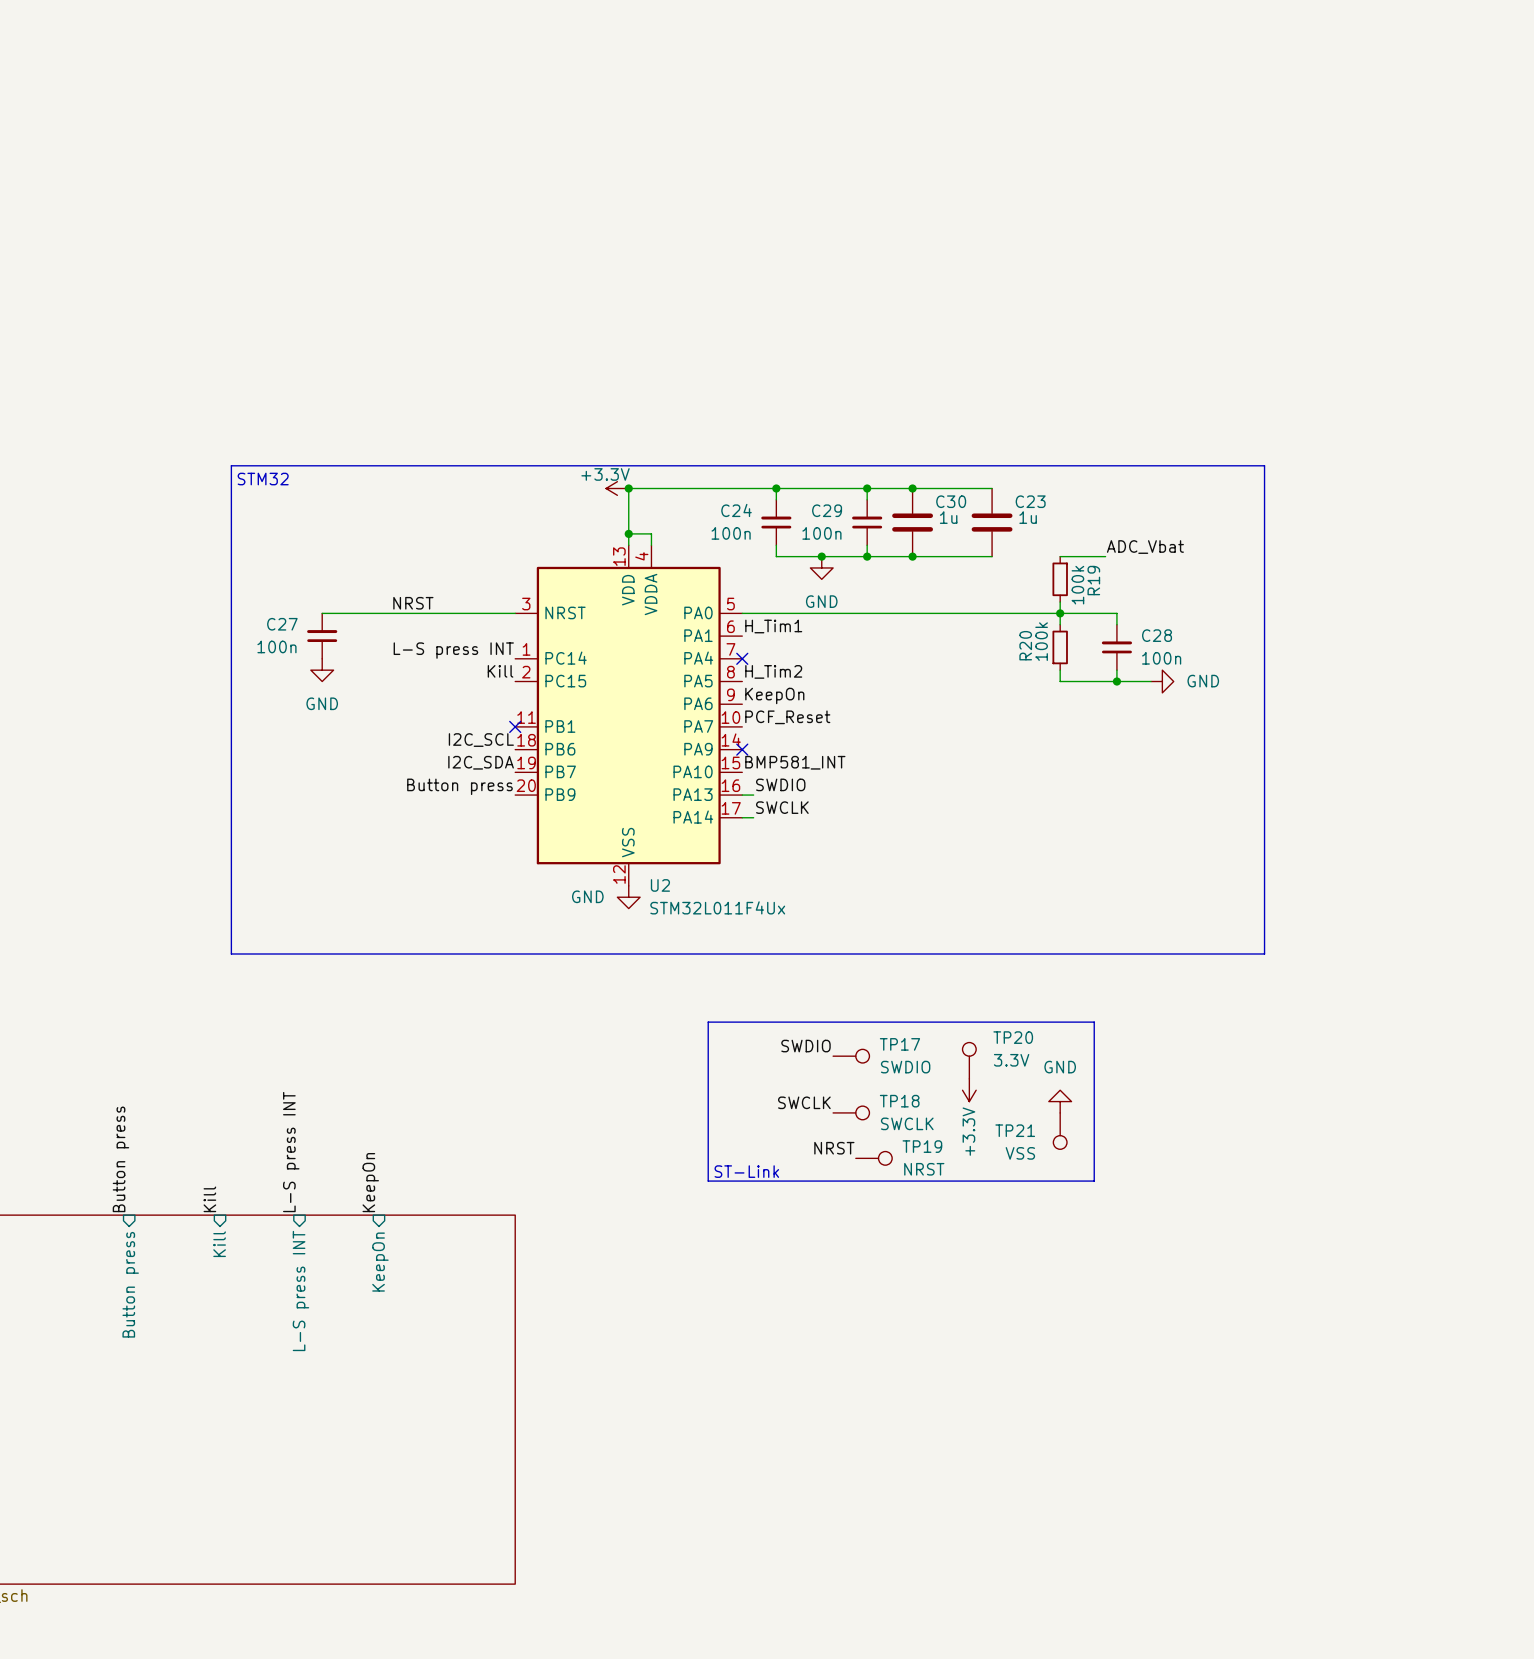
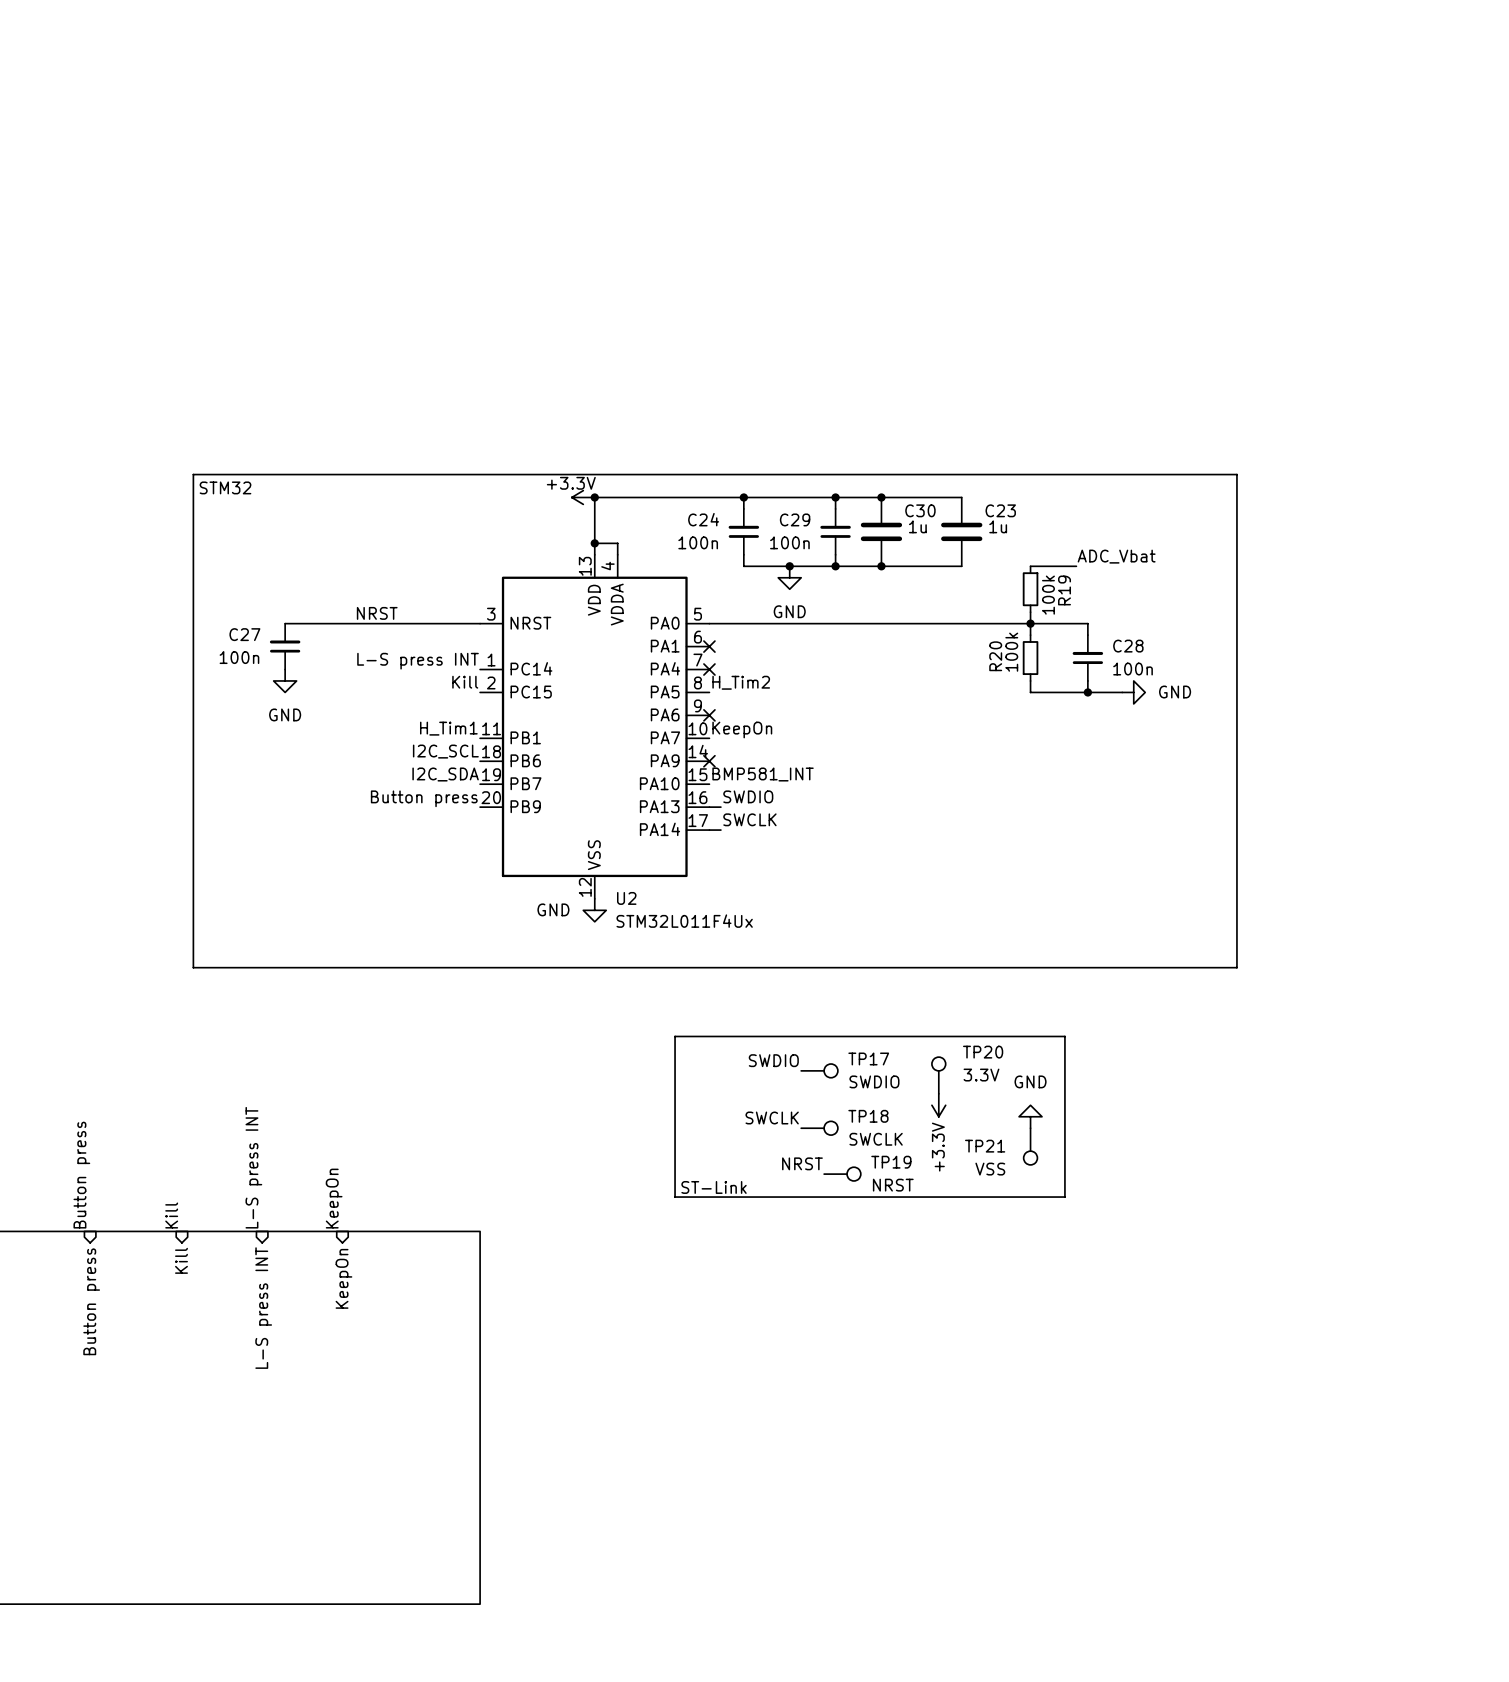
label: H_Tim1 (773, 626) -> none
no-connect mark: none -> (709, 646)
label: KeepOn (774, 695) -> none
no-connect mark: none -> (709, 715)
label: none -> H_Tim1 (448, 728)
label: PCF_Reset (787, 717) -> KeepOn (742, 729)
no-connect mark: (515, 726) -> none

